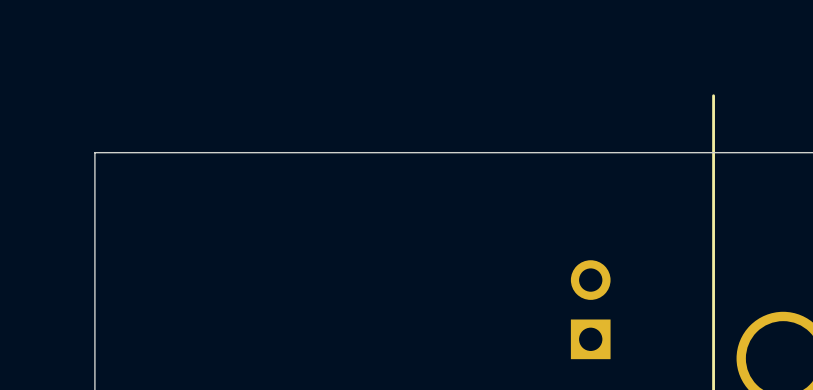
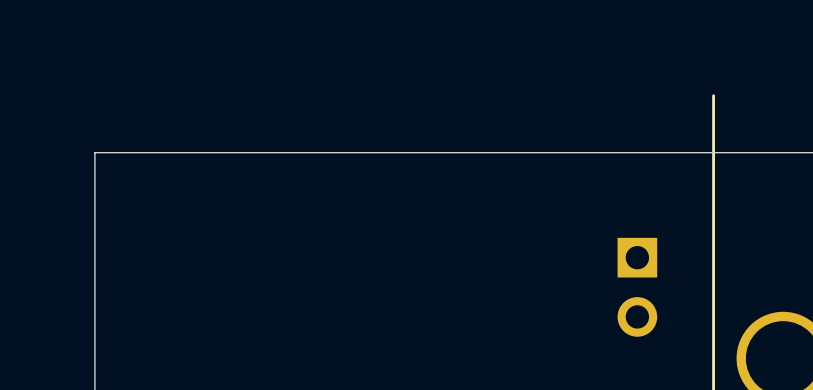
part rotation: 0° (590, 309) -> 180° (637, 287)

